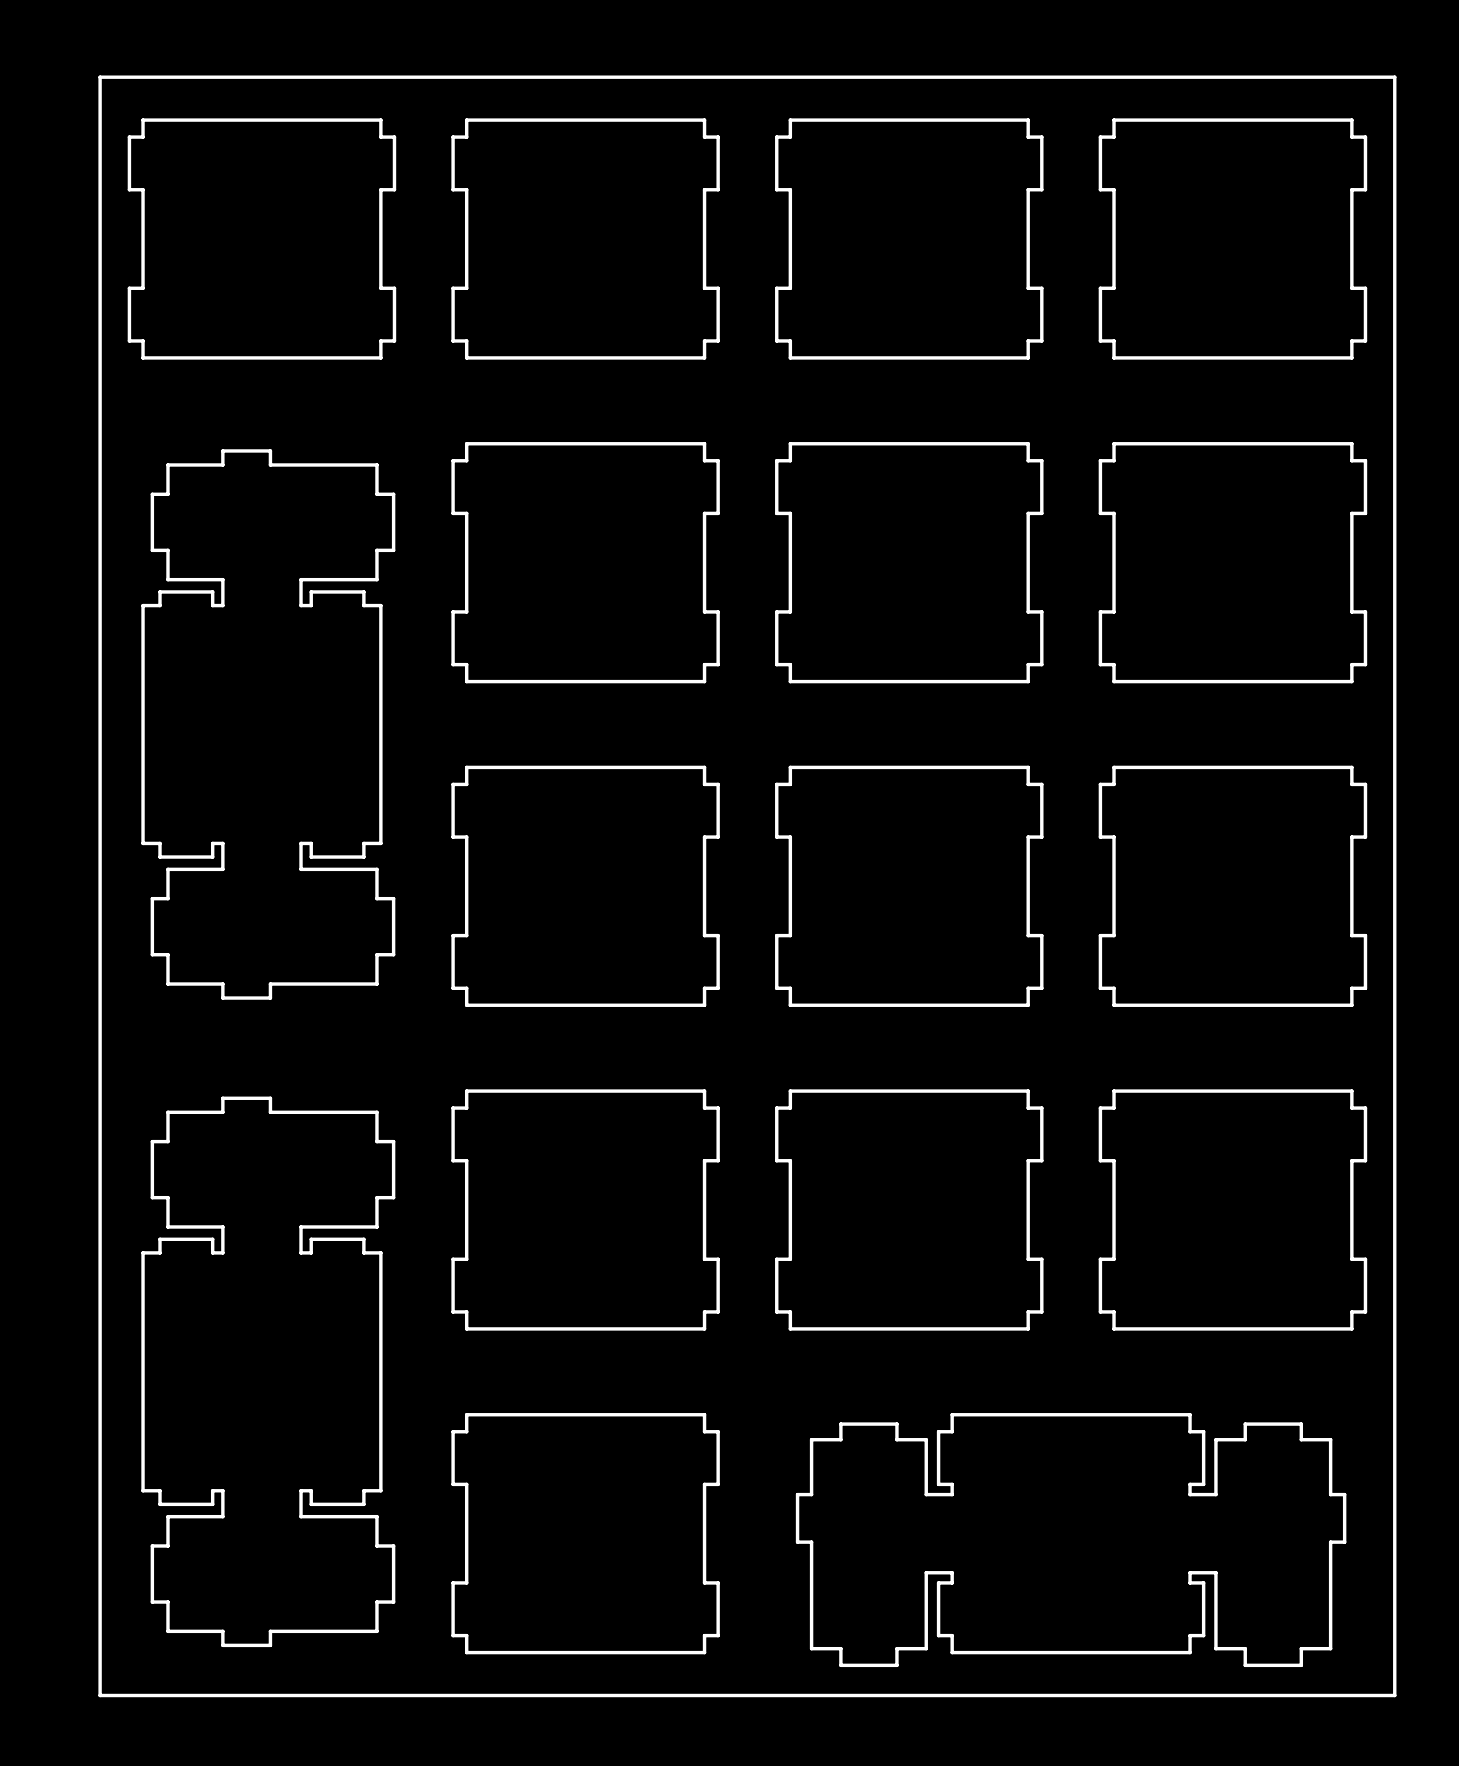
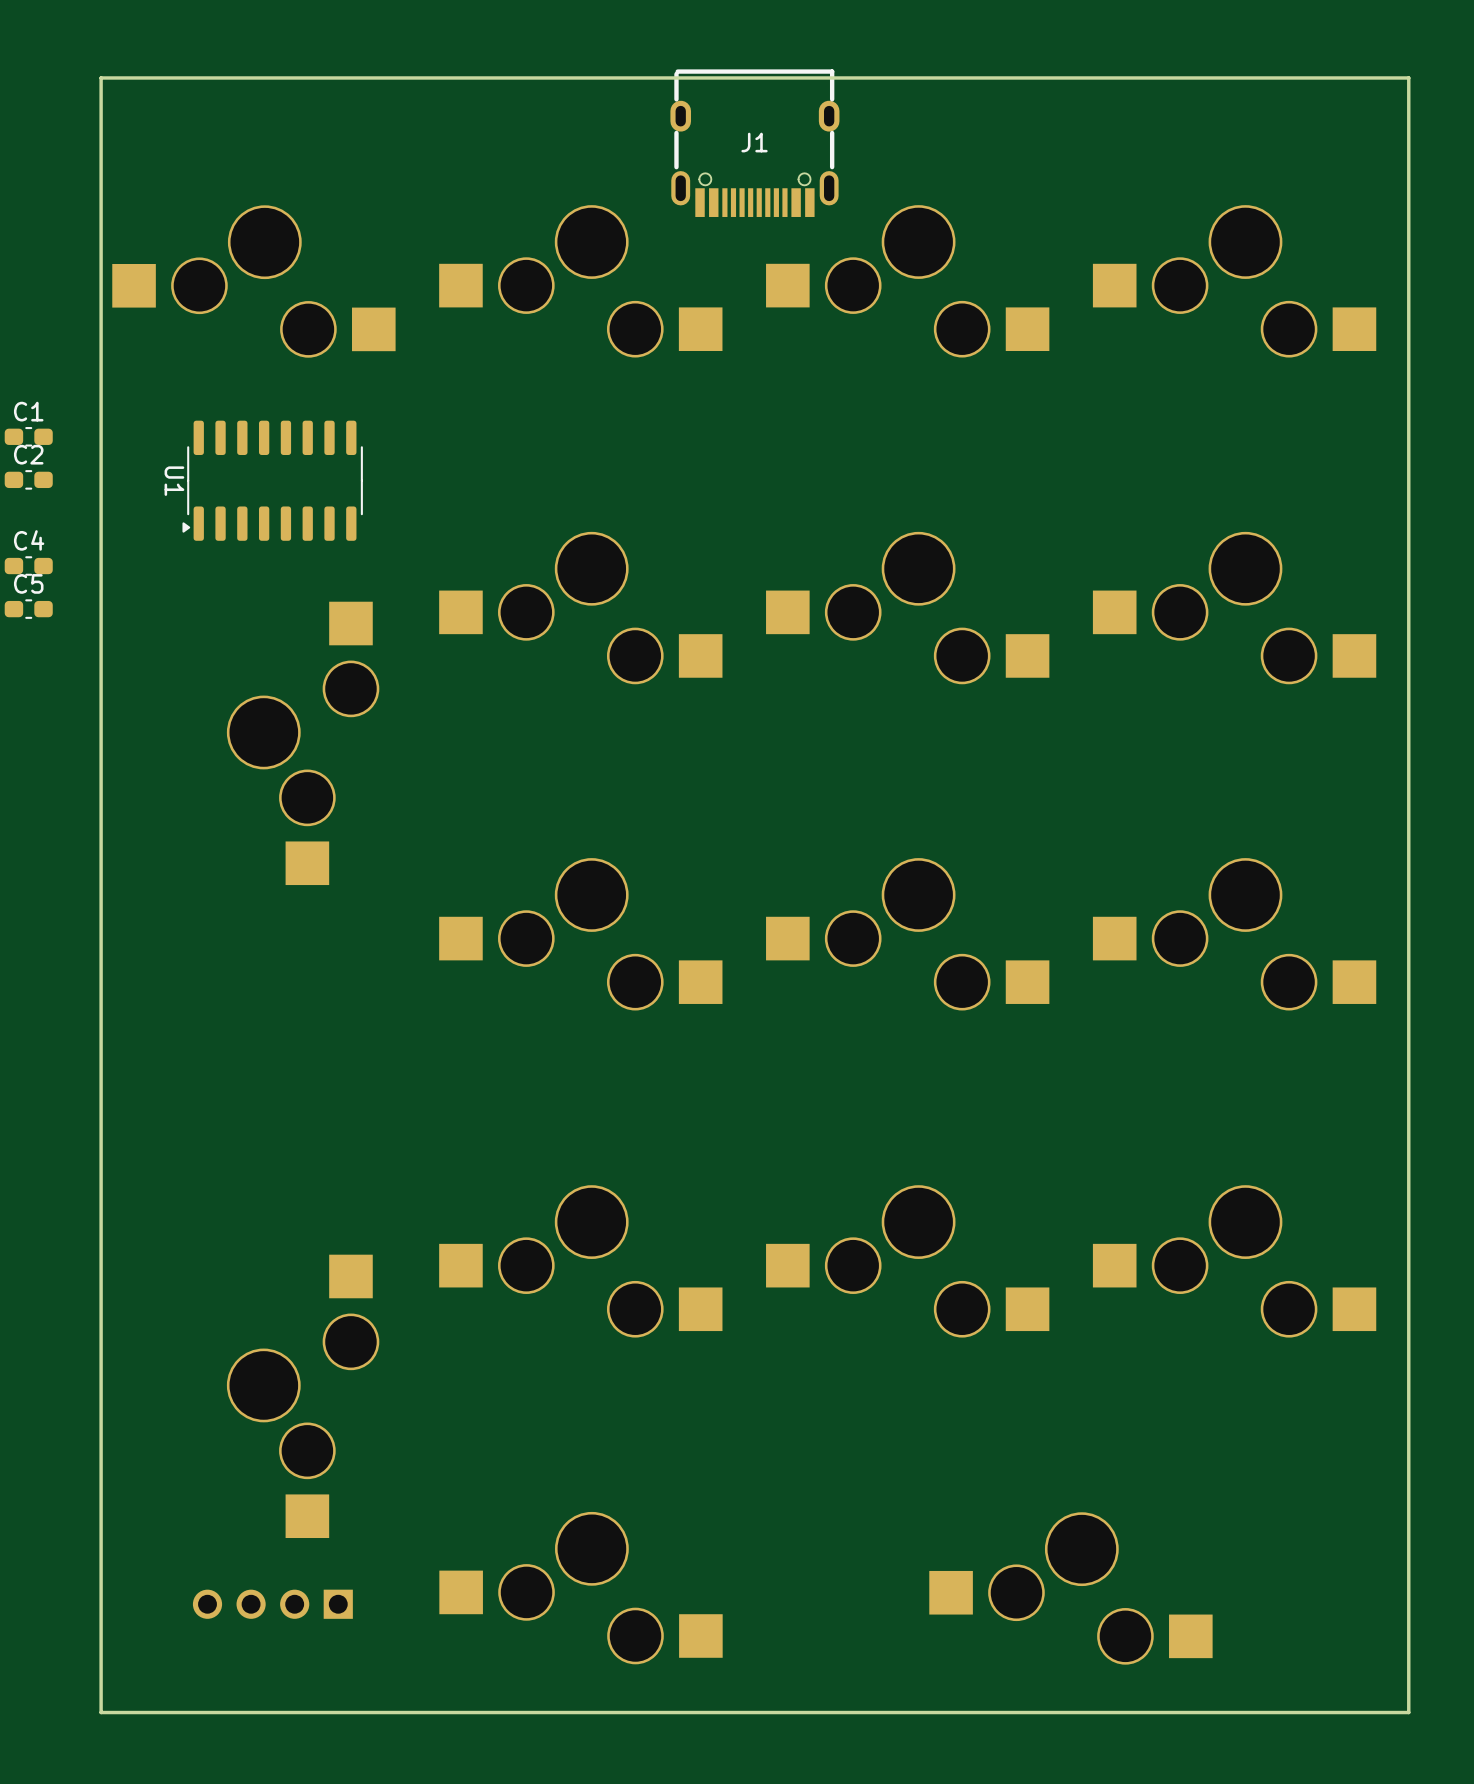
board edge: (380, 120) (380, 137) (394, 137) (394, 189) (380, 189) (380, 288) (394, 288) (394, 340) (380, 340) (380, 357) (143, 357) (143, 340) (129, 340) (129, 288) (143, 288) (143, 189) (129, 189) (129, 137) (143, 137) (143, 120) (380, 120) -> none
board edge: (704, 120) (704, 137) (718, 137) (718, 189) (704, 189) (704, 288) (718, 288) (718, 340) (704, 340) (704, 357) (466, 357) (466, 340) (453, 340) (453, 288) (466, 288) (466, 189) (453, 189) (453, 137) (466, 137) (466, 120) (704, 120) -> none
board edge: (1028, 120) (1028, 137) (1041, 137) (1041, 189) (1028, 189) (1028, 288) (1041, 288) (1041, 340) (1028, 340) (1028, 357) (790, 357) (790, 340) (776, 340) (776, 288) (790, 288) (790, 189) (776, 189) (776, 137) (790, 137) (790, 120) (1028, 120) -> none
board edge: (1351, 120) (1351, 137) (1365, 137) (1365, 189) (1351, 189) (1351, 288) (1365, 288) (1365, 340) (1351, 340) (1351, 357) (1114, 357) (1114, 340) (1100, 340) (1100, 288) (1114, 288) (1114, 189) (1100, 189) (1100, 137) (1114, 137) (1114, 120) (1351, 120) -> none
J1: none -> (754, 143)
part: none -> (253, 281)
part: none -> (580, 281)
part: none -> (907, 281)
part: none -> (1234, 281)
C1: none -> (28, 436)
board edge: (704, 443) (704, 460) (718, 460) (718, 513) (704, 513) (704, 611) (718, 611) (718, 664) (704, 664) (704, 681) (466, 681) (466, 664) (453, 664) (453, 611) (466, 611) (466, 513) (453, 513) (453, 460) (466, 460) (466, 443) (704, 443) -> none
board edge: (1028, 443) (1028, 460) (1041, 460) (1041, 513) (1028, 513) (1028, 611) (1041, 611) (1041, 664) (1028, 664) (1028, 681) (790, 681) (790, 664) (776, 664) (776, 611) (790, 611) (790, 513) (776, 513) (776, 460) (790, 460) (790, 443) (1028, 443) -> none
board edge: (1351, 443) (1114, 443) (1114, 460) (1100, 460) (1100, 513) (1114, 513) (1114, 611) (1100, 611) (1100, 664) (1114, 664) (1114, 681) (1351, 681) (1351, 664) (1365, 664) (1365, 611) (1351, 611) (1351, 513) (1365, 513) (1365, 460) (1351, 460) (1351, 443) -> none
board edge: (270, 450) (270, 464) (376, 464) (376, 494) (393, 494) (393, 550) (376, 550) (376, 579) (301, 579) (301, 605) (311, 605) (311, 591) (363, 591) (363, 605) (380, 605) (380, 843) (363, 843) (363, 857) (311, 857) (311, 843) (301, 843) (301, 869) (376, 869) (376, 898) (393, 898) (393, 954) (376, 954) (376, 984) (270, 984) (270, 998) (222, 998) (222, 984) (167, 984) (167, 954) (152, 954) (152, 898) (167, 898) (167, 869) (222, 869) (222, 843) (212, 843) (212, 857) (160, 857) (160, 843) (143, 843) (143, 605) (160, 605) (160, 591) (212, 591) (212, 605) (222, 605) (222, 579) (167, 579) (167, 550) (152, 550) (152, 494) (167, 494) (167, 464) (222, 464) (222, 450) (270, 450) -> none
C2: none -> (28, 479)
U1: none -> (272, 480)
C4: none -> (28, 566)
part: none -> (580, 608)
part: none -> (907, 608)
part: none -> (1234, 608)
C5: none -> (28, 609)
part: none -> (303, 743)
board edge: (704, 767) (704, 784) (718, 784) (718, 837) (704, 837) (704, 935) (718, 935) (718, 988) (704, 988) (704, 1005) (466, 1005) (466, 988) (453, 988) (453, 935) (466, 935) (466, 837) (453, 837) (453, 784) (466, 784) (466, 767) (704, 767) -> none
board edge: (1028, 767) (1028, 784) (1041, 784) (1041, 837) (1028, 837) (1028, 935) (1041, 935) (1041, 988) (1028, 988) (1028, 1005) (790, 1005) (790, 988) (776, 988) (776, 935) (790, 935) (790, 837) (776, 837) (776, 784) (790, 784) (790, 767) (1028, 767) -> none
board edge: (1351, 767) (1351, 784) (1365, 784) (1365, 837) (1351, 837) (1351, 935) (1365, 935) (1365, 988) (1351, 988) (1351, 1005) (1114, 1005) (1114, 988) (1100, 988) (1100, 935) (1114, 935) (1114, 837) (1100, 837) (1100, 784) (1114, 784) (1114, 767) (1351, 767) -> none
part: none -> (580, 934)
part: none -> (907, 934)
part: none -> (1234, 934)
board edge: (704, 1091) (704, 1108) (718, 1108) (718, 1160) (704, 1160) (704, 1259) (718, 1259) (718, 1311) (704, 1311) (704, 1328) (466, 1328) (466, 1311) (453, 1311) (453, 1259) (466, 1259) (466, 1160) (453, 1160) (453, 1108) (466, 1108) (466, 1091) (704, 1091) -> none
board edge: (1028, 1091) (1028, 1108) (1041, 1108) (1041, 1160) (1028, 1160) (1028, 1259) (1041, 1259) (1041, 1311) (1028, 1311) (1028, 1328) (790, 1328) (790, 1311) (776, 1311) (776, 1259) (790, 1259) (790, 1160) (776, 1160) (776, 1108) (790, 1108) (790, 1091) (1028, 1091) -> none
board edge: (1351, 1091) (1114, 1091) (1114, 1108) (1100, 1108) (1100, 1160) (1114, 1160) (1114, 1259) (1100, 1259) (1100, 1311) (1114, 1311) (1114, 1328) (1351, 1328) (1351, 1311) (1365, 1311) (1365, 1259) (1351, 1259) (1351, 1160) (1365, 1160) (1365, 1108) (1351, 1108) (1351, 1091) -> none
board edge: (270, 1098) (270, 1112) (376, 1112) (376, 1141) (393, 1141) (393, 1197) (376, 1197) (376, 1226) (301, 1226) (301, 1252) (311, 1252) (311, 1239) (363, 1239) (363, 1252) (380, 1252) (380, 1490) (363, 1490) (363, 1504) (311, 1504) (311, 1490) (301, 1490) (301, 1516) (376, 1516) (376, 1545) (393, 1545) (393, 1602) (376, 1602) (376, 1631) (270, 1631) (270, 1645) (222, 1645) (222, 1631) (167, 1631) (167, 1602) (152, 1602) (152, 1545) (167, 1545) (167, 1516) (222, 1516) (222, 1490) (212, 1490) (212, 1504) (160, 1504) (160, 1490) (143, 1490) (143, 1252) (160, 1252) (160, 1239) (212, 1239) (212, 1252) (222, 1252) (222, 1226) (167, 1226) (167, 1197) (152, 1197) (152, 1141) (167, 1141) (167, 1112) (222, 1112) (222, 1098) (270, 1098) -> none
part: none -> (580, 1261)
part: none -> (907, 1261)
part: none -> (1234, 1261)
part: none -> (303, 1396)
board edge: (704, 1414) (704, 1431) (718, 1431) (718, 1484) (704, 1484) (704, 1582) (718, 1582) (718, 1635) (704, 1635) (704, 1652) (466, 1652) (466, 1635) (453, 1635) (453, 1582) (466, 1582) (466, 1484) (453, 1484) (453, 1431) (466, 1431) (466, 1414) (704, 1414) -> none
board edge: (1190, 1414) (952, 1414) (952, 1431) (938, 1431) (938, 1484) (952, 1484) (952, 1494) (926, 1494) (926, 1439) (896, 1439) (896, 1424) (840, 1424) (840, 1439) (811, 1439) (811, 1494) (797, 1494) (797, 1542) (811, 1542) (811, 1648) (840, 1648) (840, 1665) (896, 1665) (896, 1648) (926, 1648) (926, 1572) (952, 1572) (952, 1582) (938, 1582) (938, 1635) (952, 1635) (952, 1652) (1190, 1652) (1190, 1635) (1203, 1635) (1203, 1582) (1190, 1582) (1190, 1572) (1215, 1572) (1215, 1648) (1245, 1648) (1245, 1665) (1301, 1665) (1301, 1648) (1330, 1648) (1330, 1542) (1344, 1542) (1344, 1494) (1330, 1494) (1330, 1439) (1301, 1439) (1301, 1424) (1245, 1424) (1245, 1439) (1215, 1439) (1215, 1494) (1190, 1494) (1190, 1484) (1203, 1484) (1203, 1431) (1190, 1431) (1190, 1414) -> none
part: none -> (581, 1588)
part: none -> (1070, 1588)
part: none -> (272, 1604)

